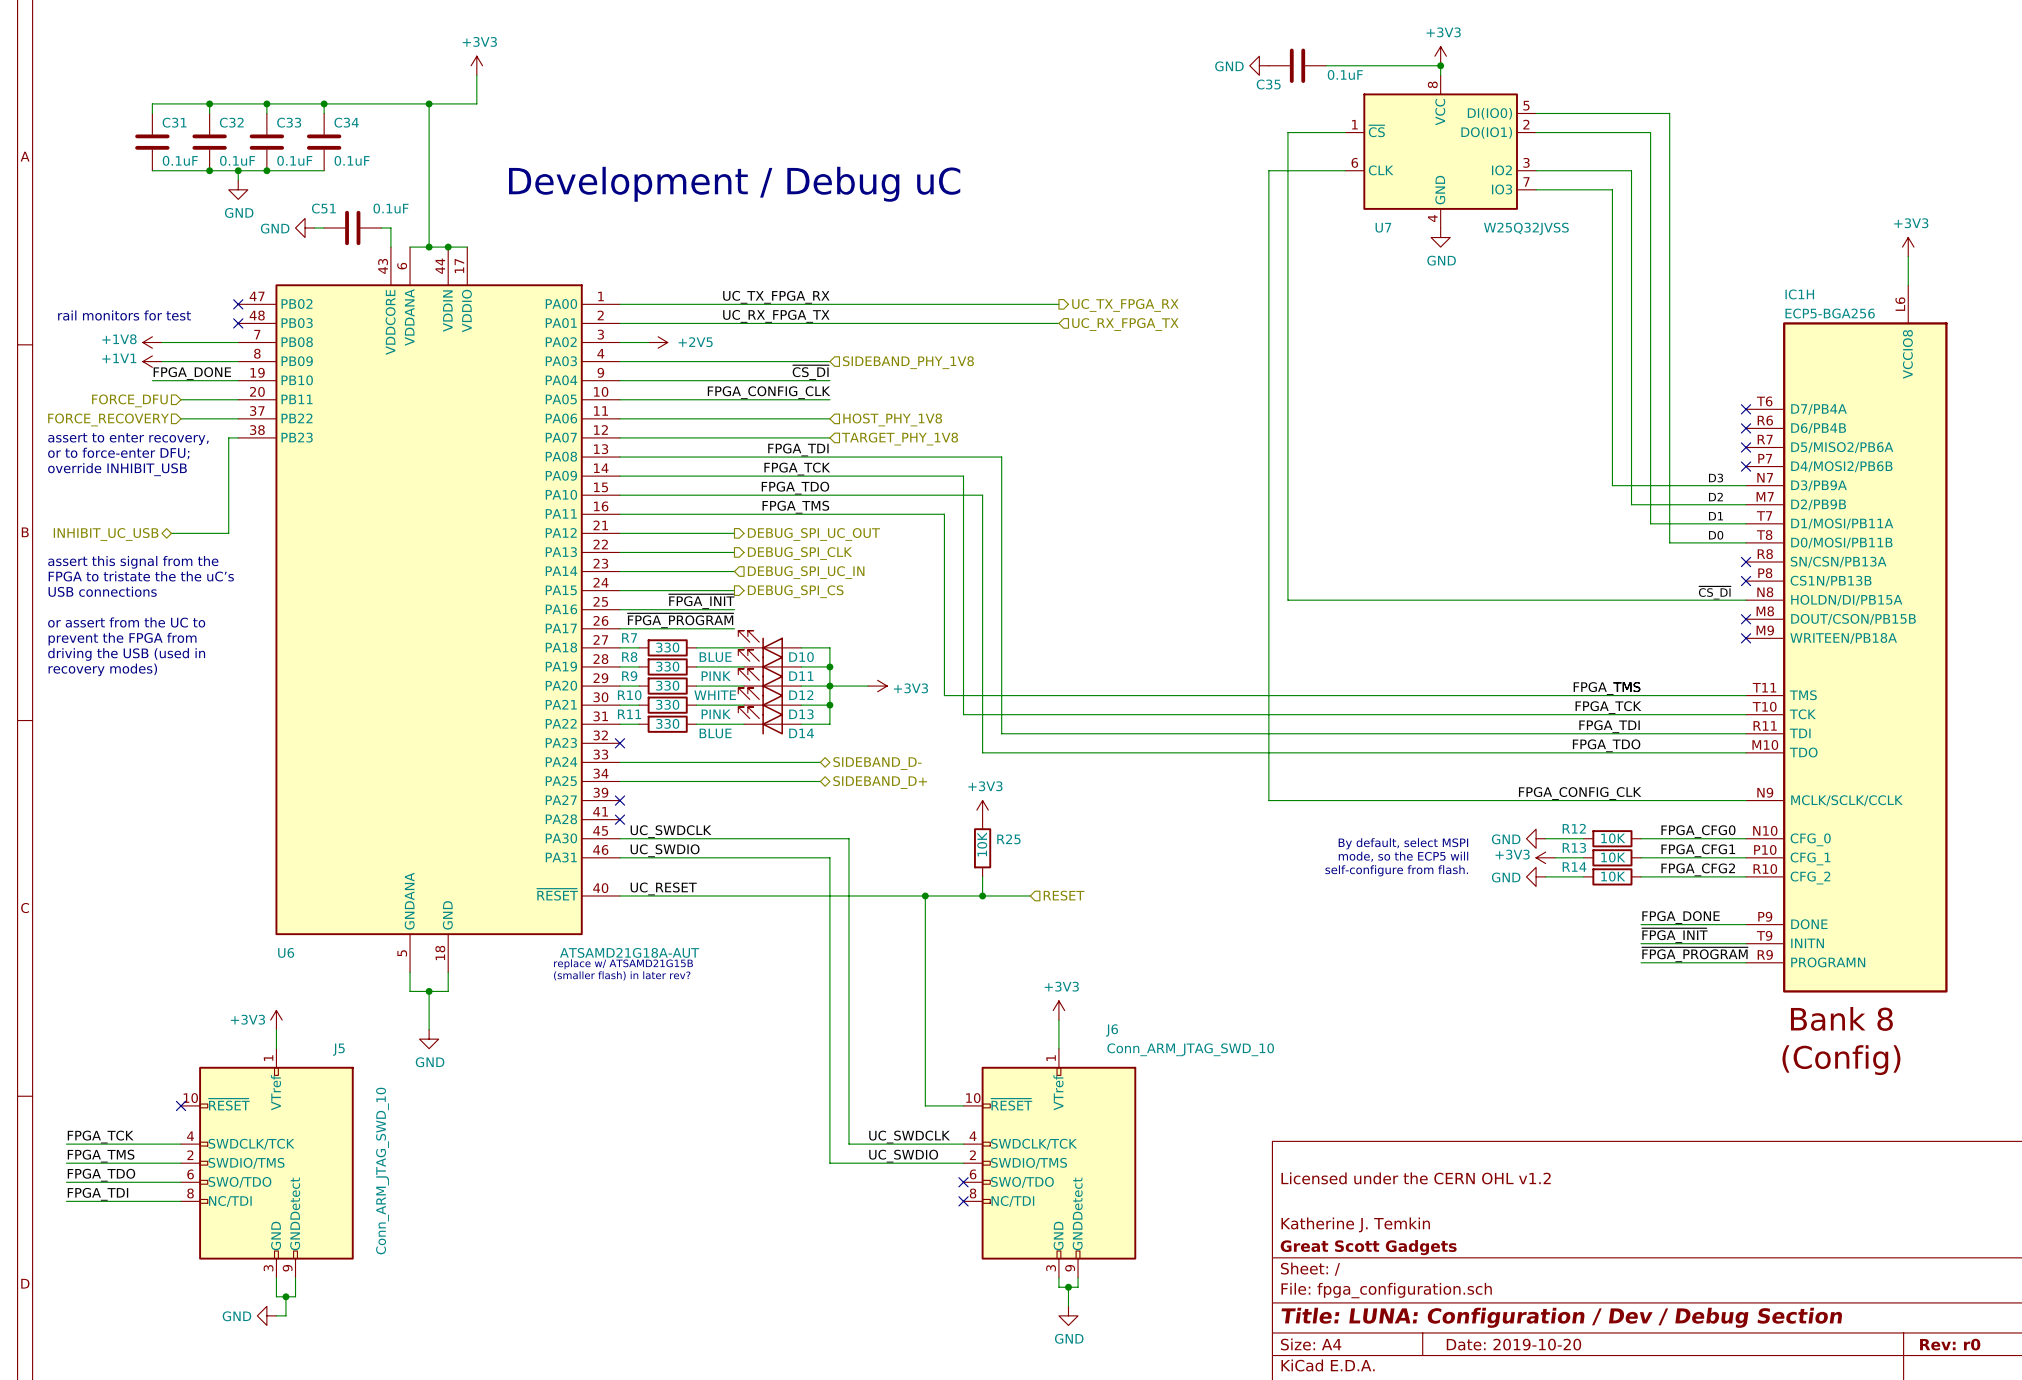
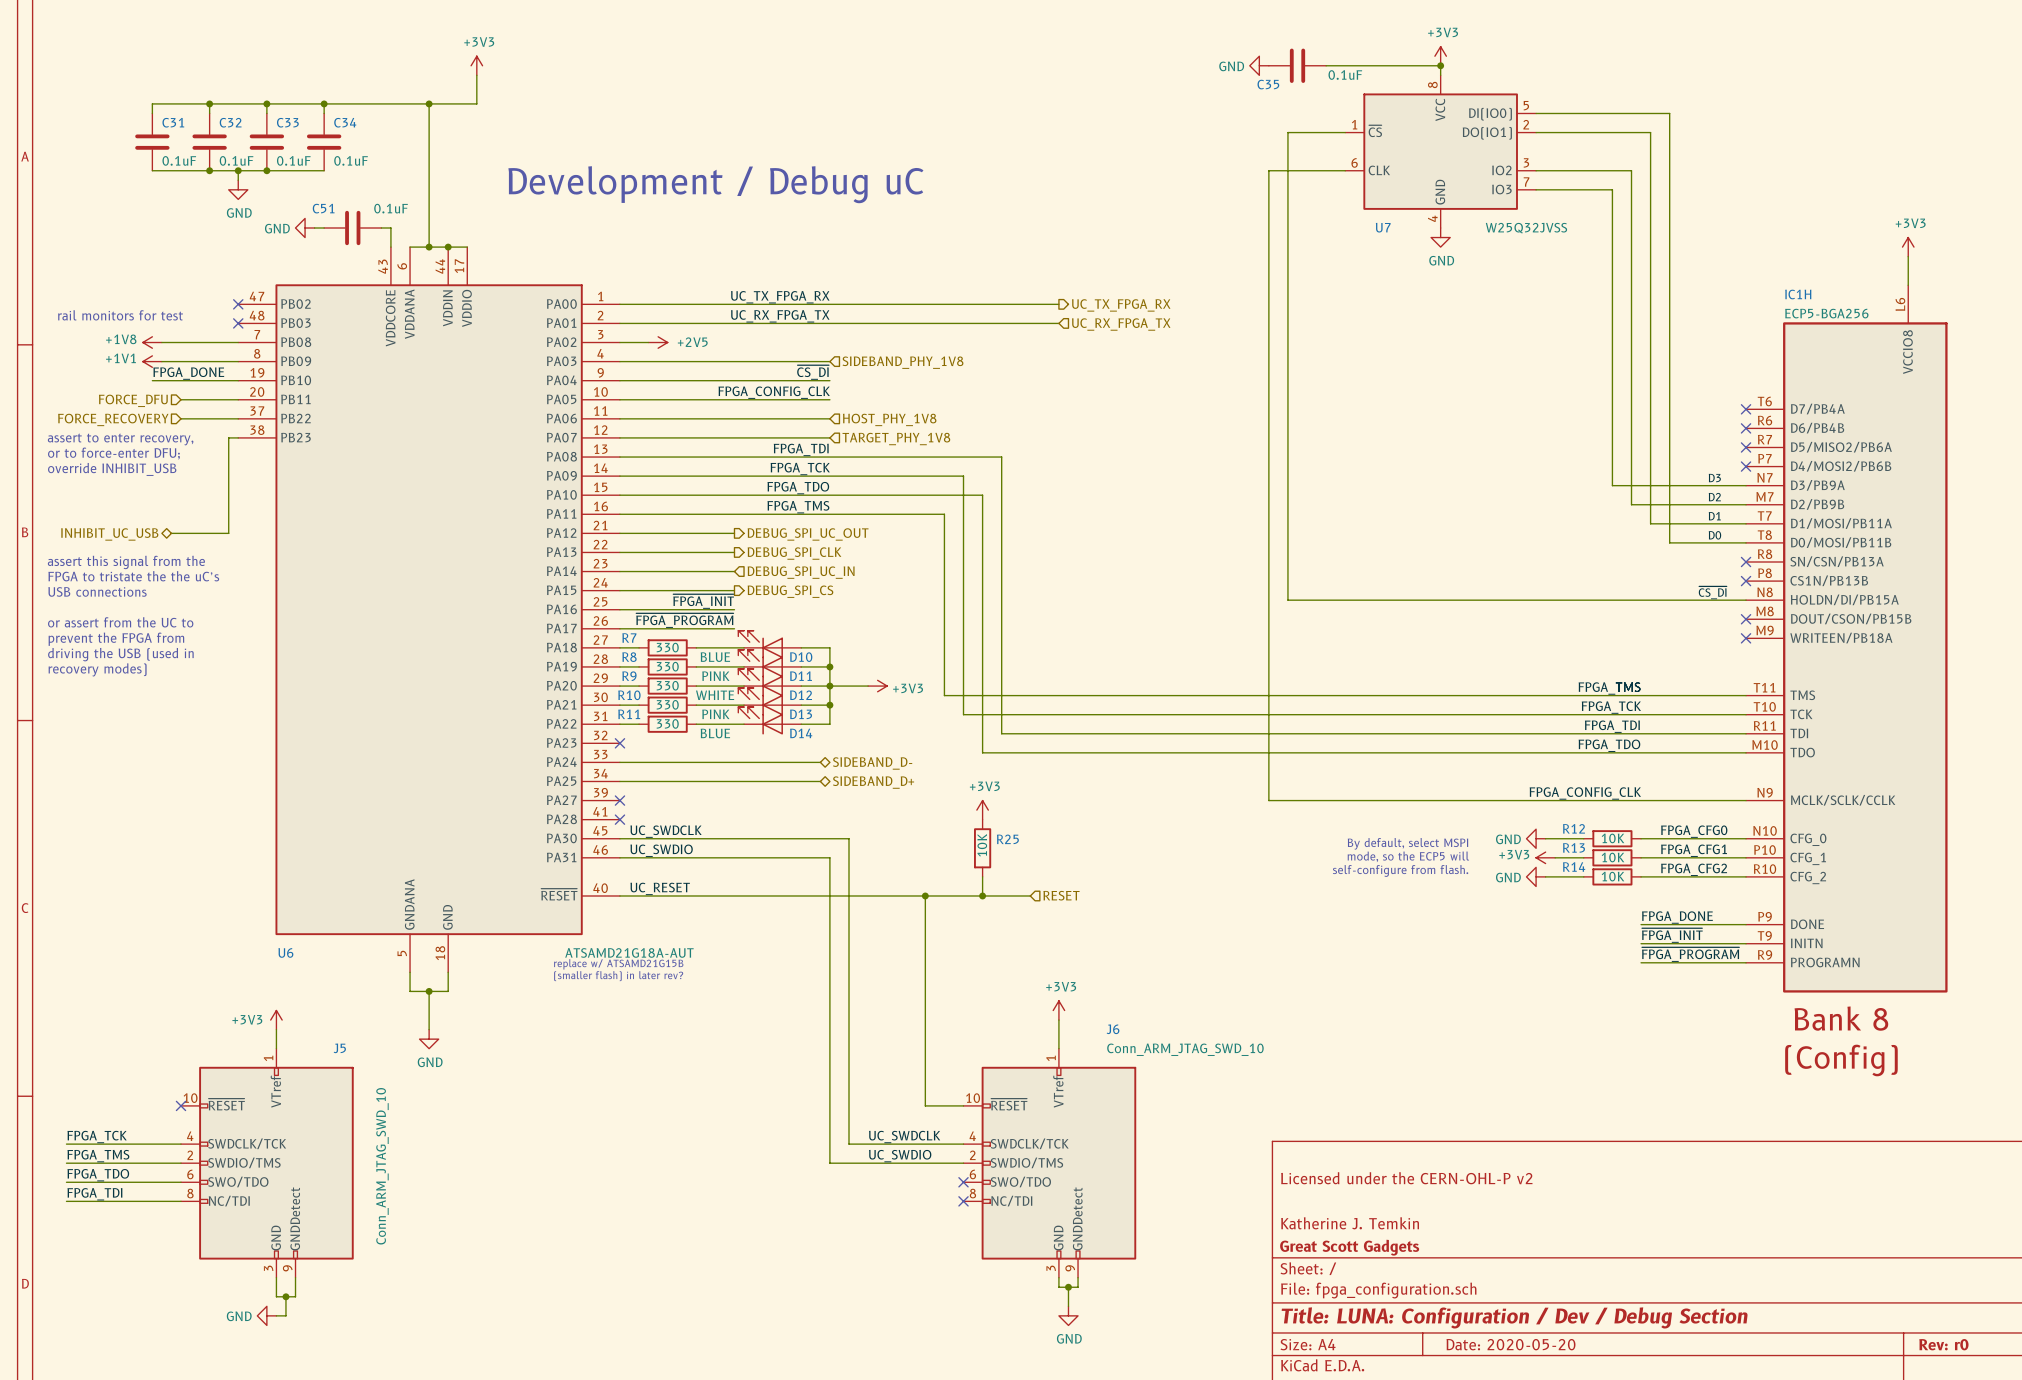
title block: Licensed under the CERN OHL v1.2 (1416, 1178) -> Licensed under the CERN-OHL-P v2 (1406, 1178)
title block: Date: 2019-10-20 (1513, 1344) -> Date: 2020-05-20 (1510, 1344)

